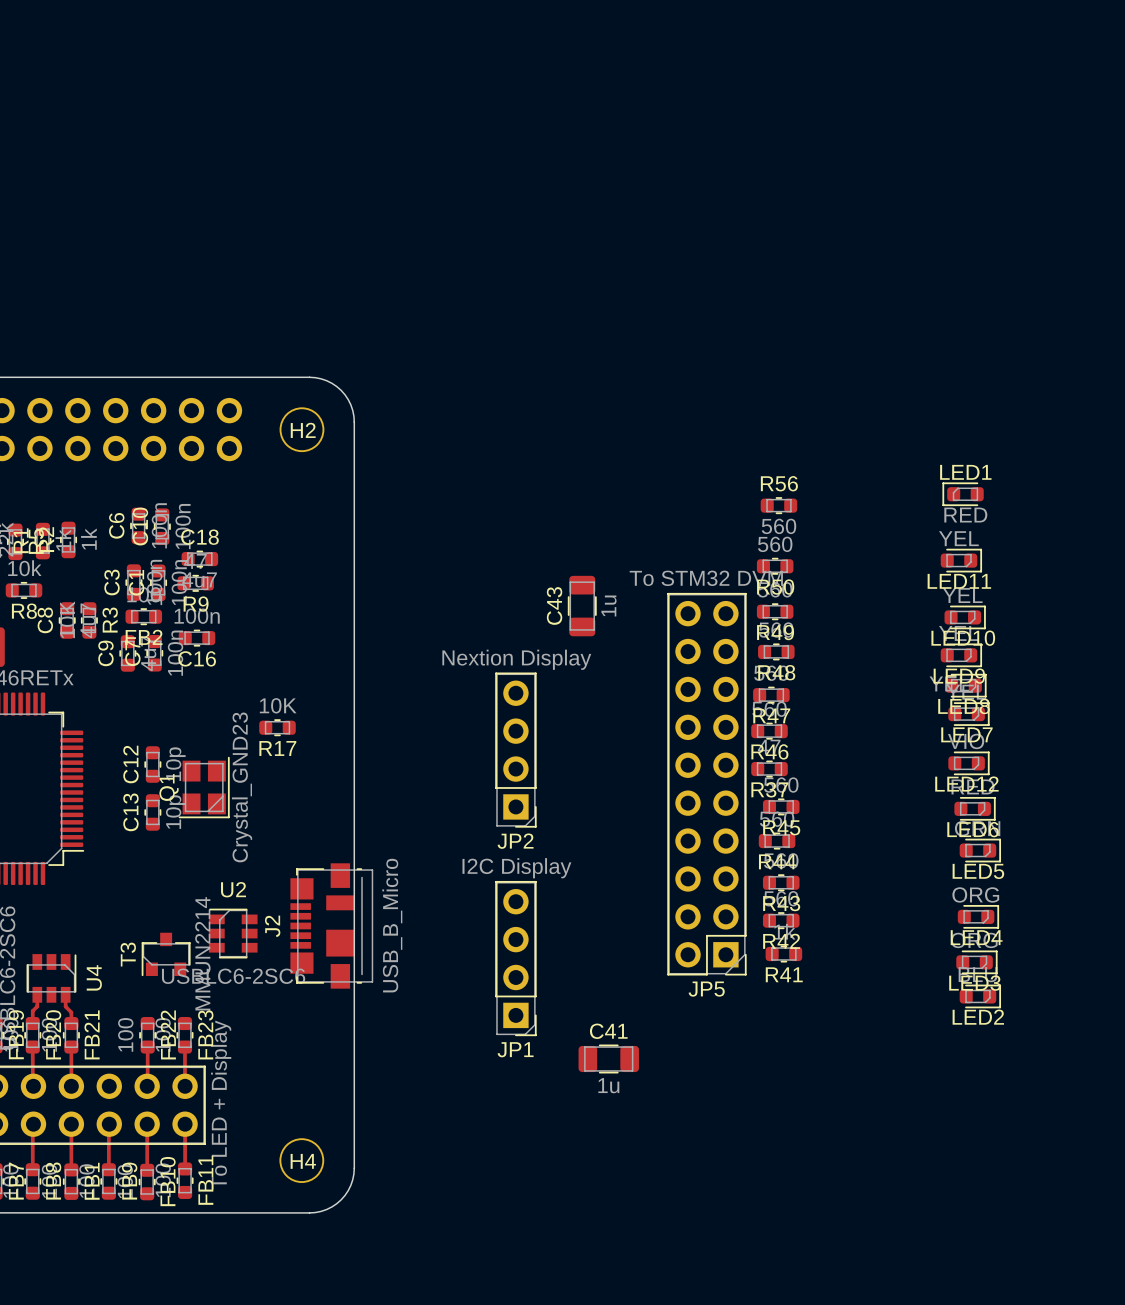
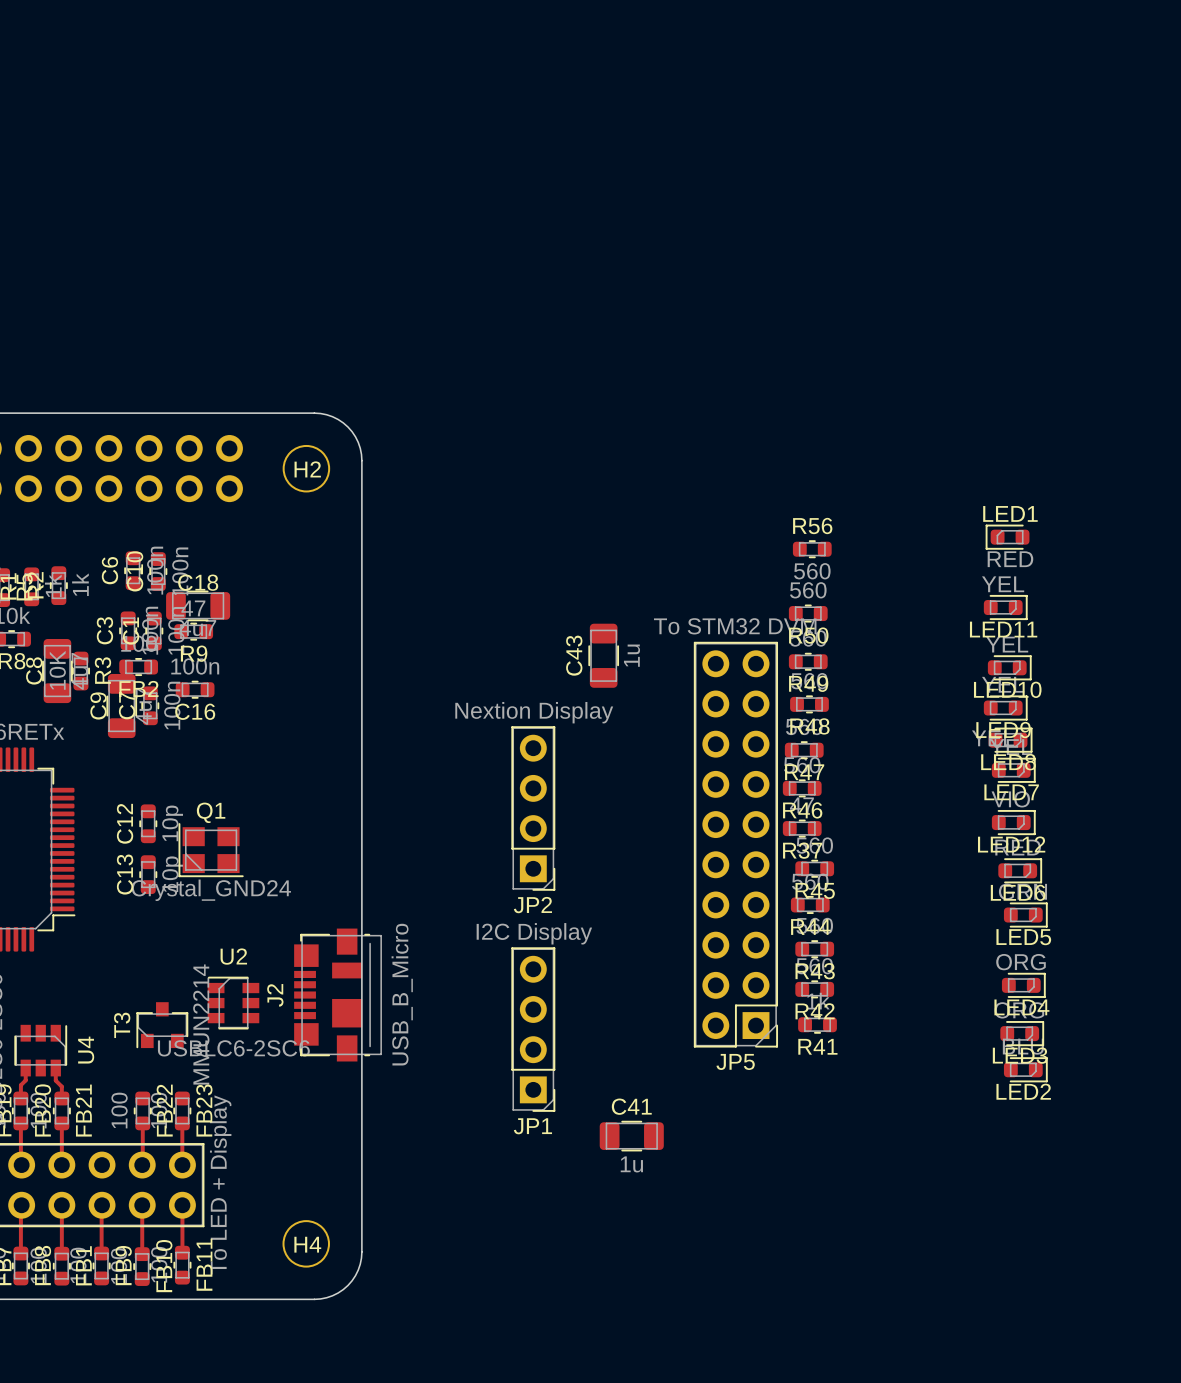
C18 footprint: [181, 550, 219, 568] -> [166, 590, 231, 622]
C8 footprint: [58, 602, 76, 639] -> [42, 638, 73, 704]
C9 footprint: [119, 635, 137, 672] -> [106, 673, 138, 739]
R17: 10K (277, 727) -> none
Q1 rotation: 0° (204, 787) -> 90° clockwise (211, 850)
Q1 value: Crystal_GND23 (242, 787) -> Crystal_GND24 (211, 890)

